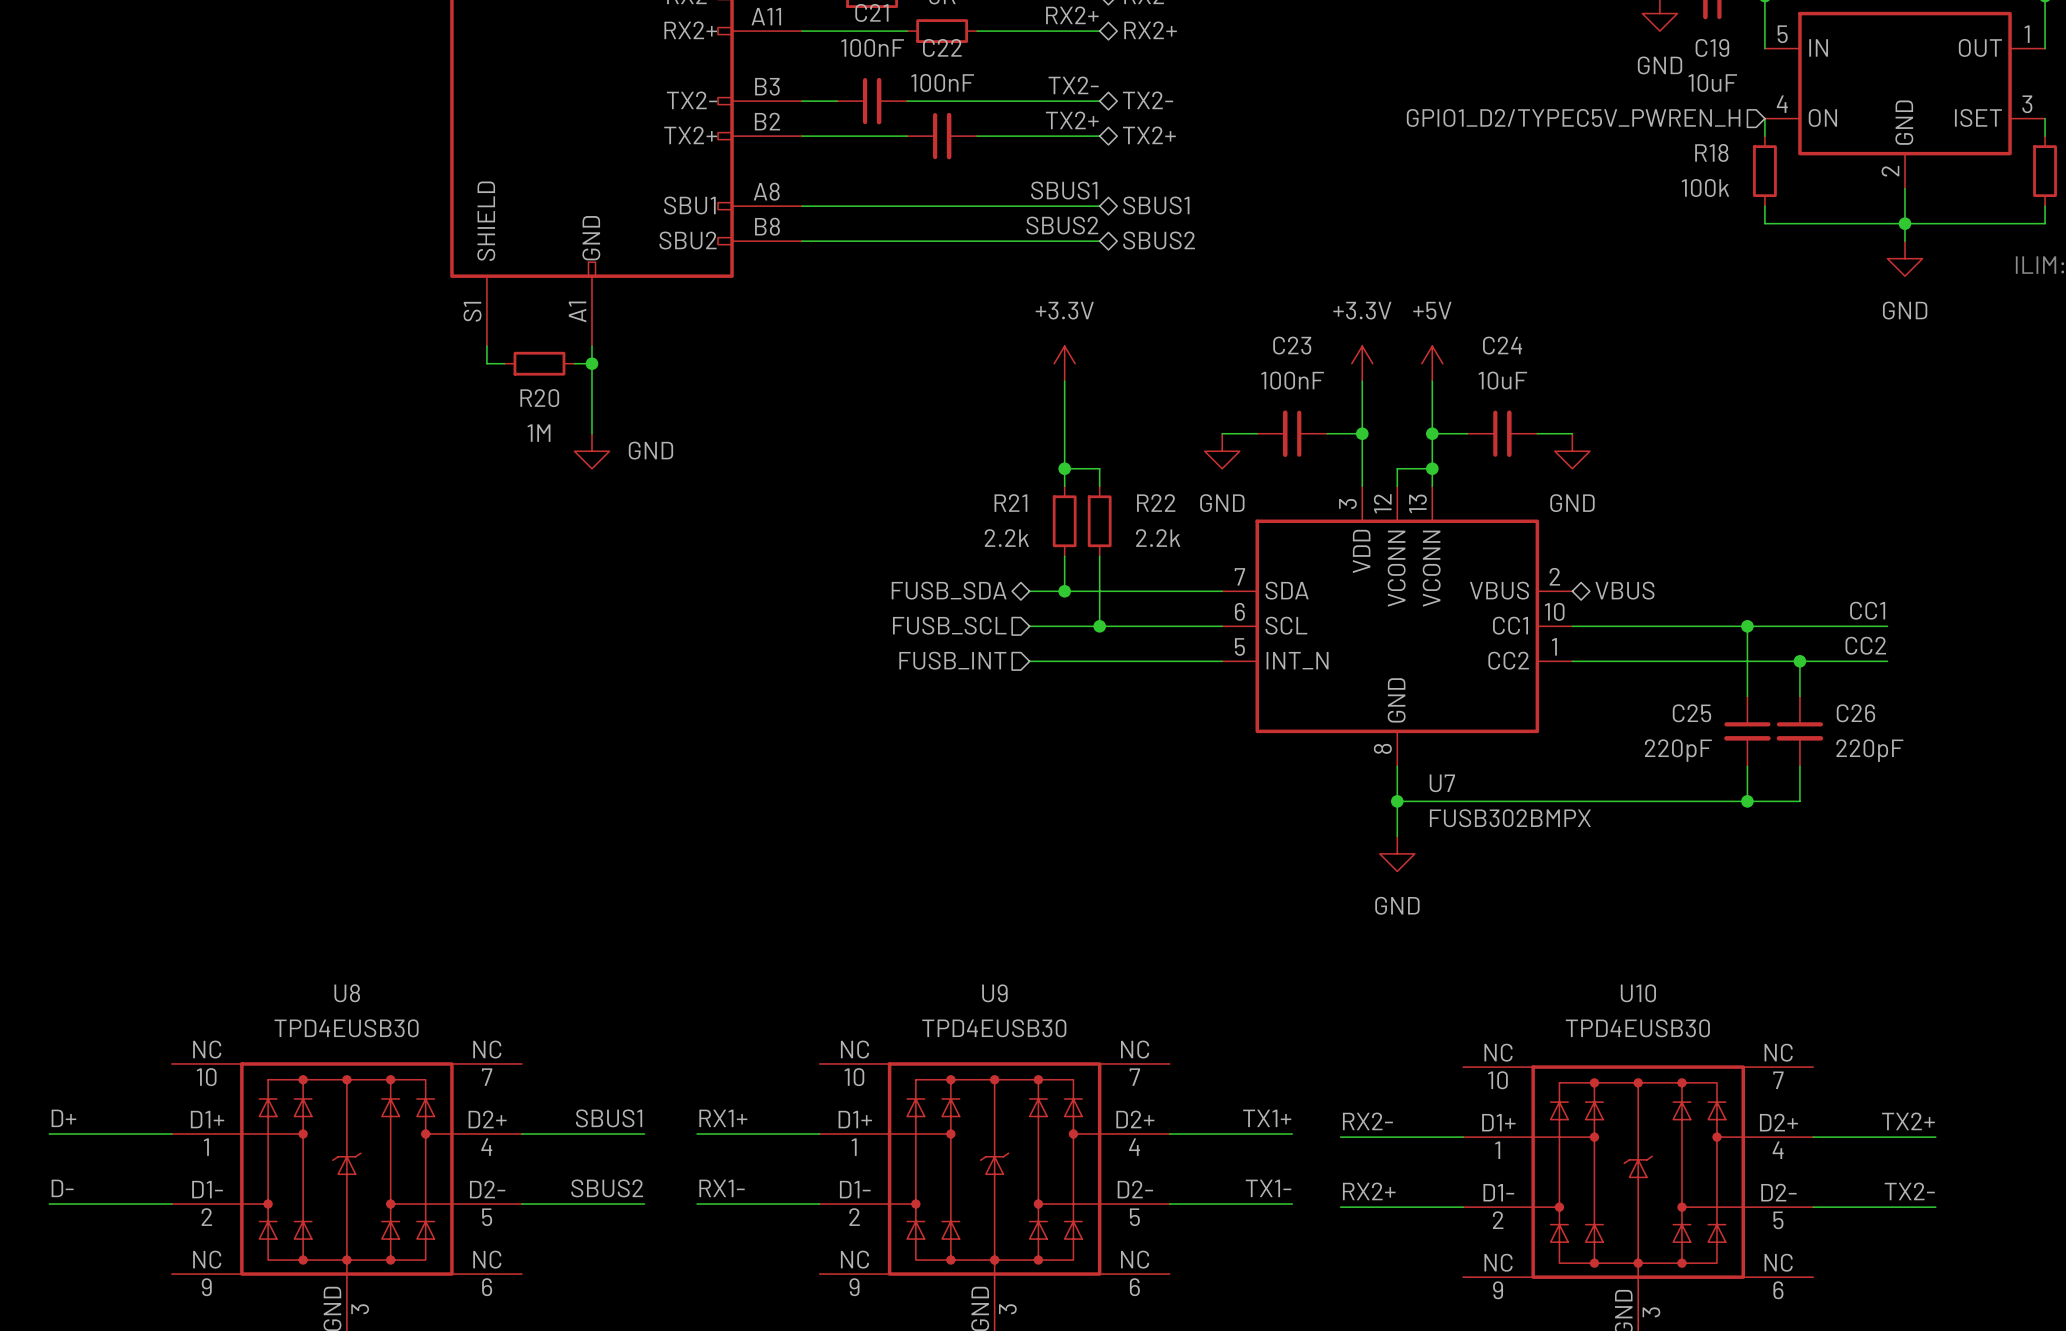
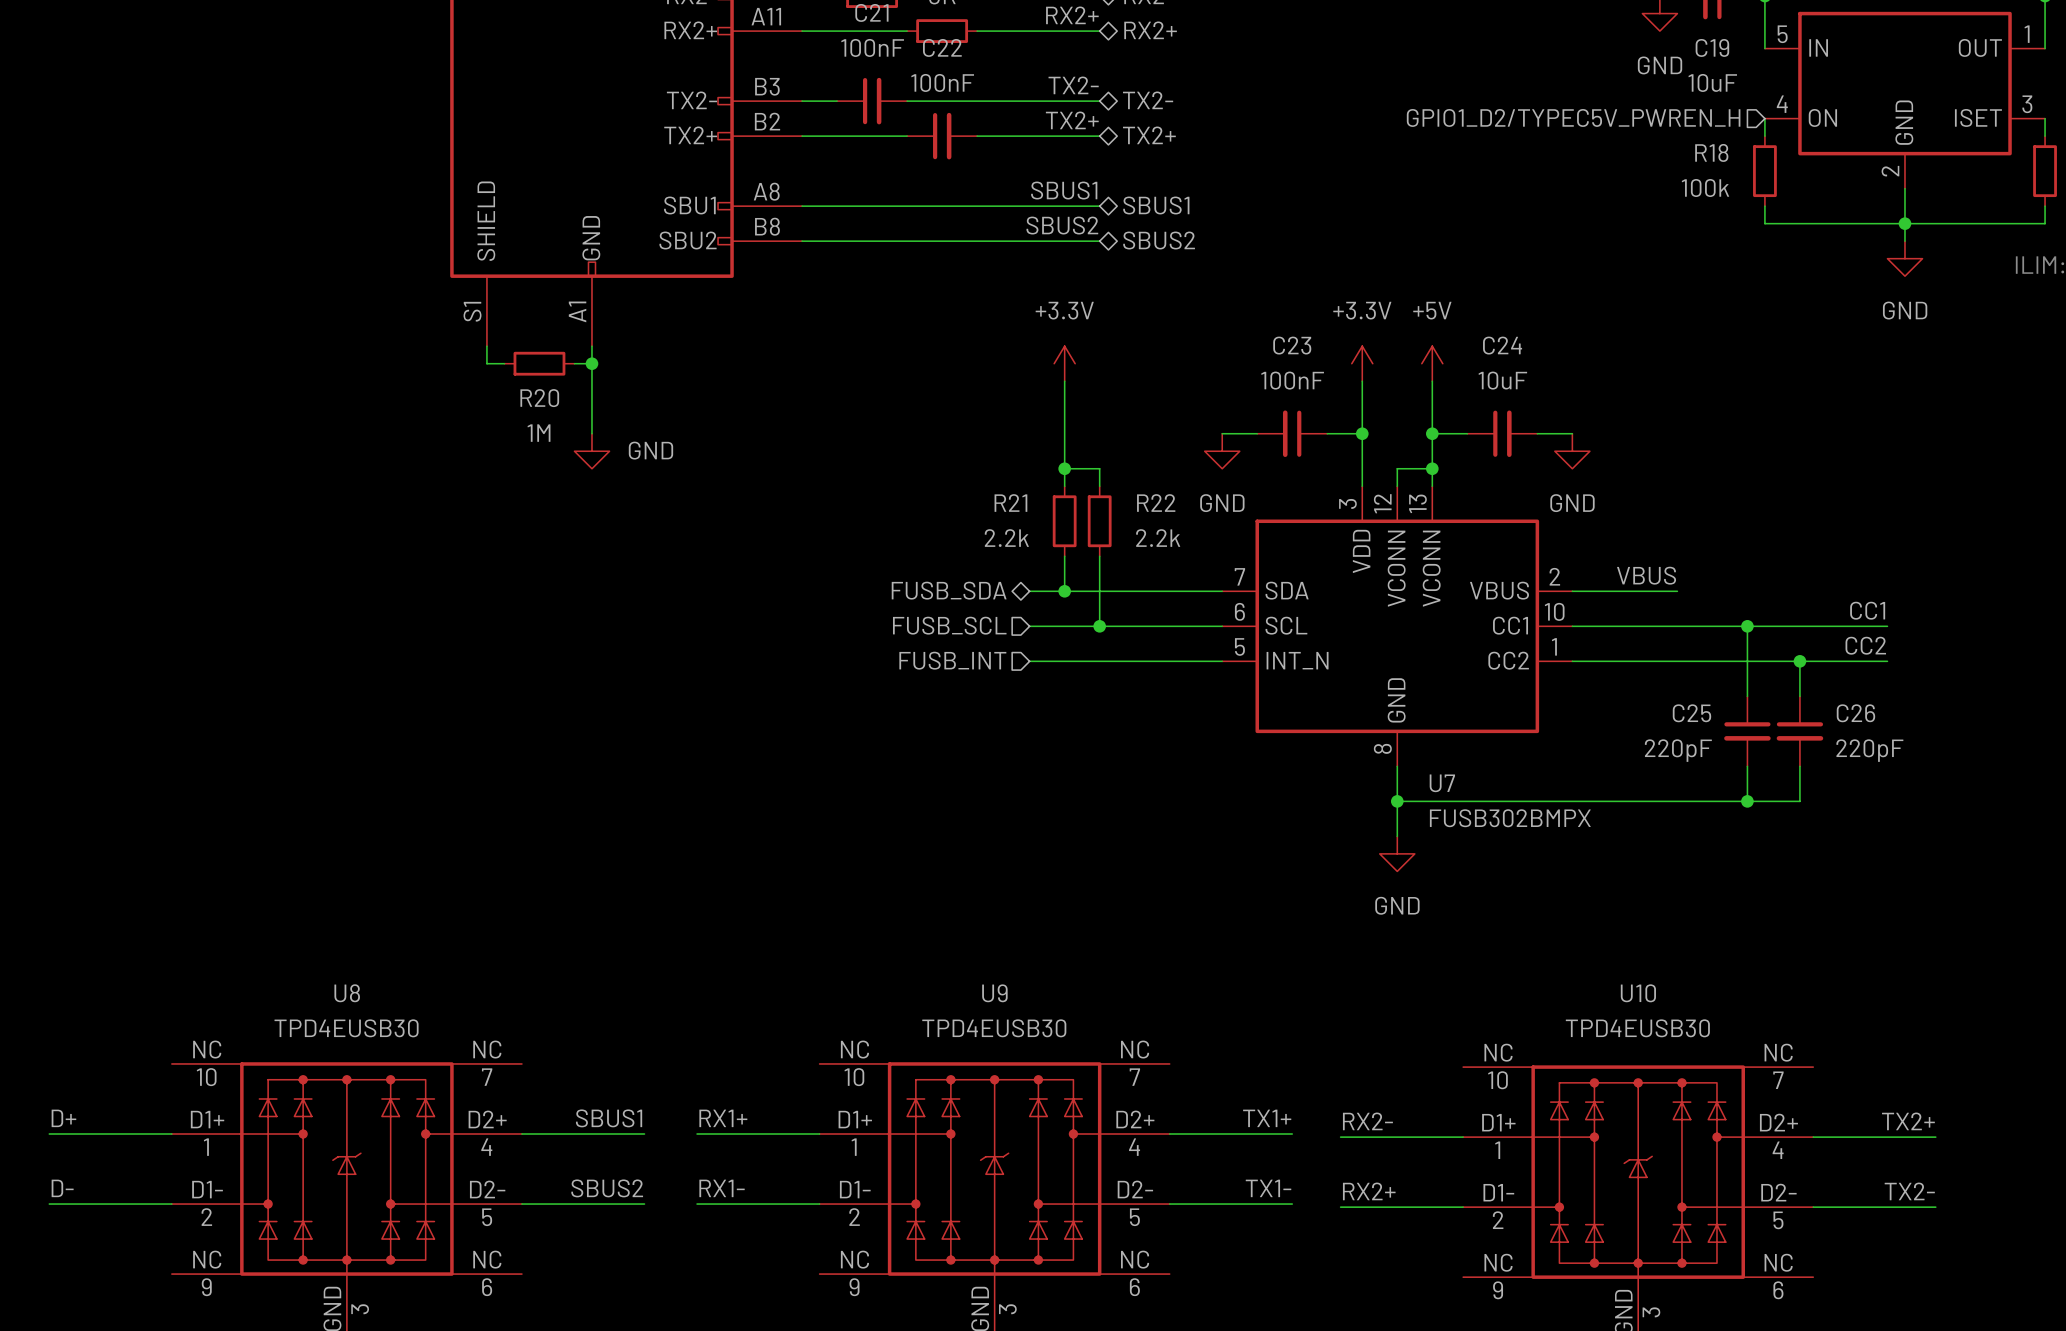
label: none -> VBUS (1646, 575)
hierarchical label: VBUS (1624, 590) -> none
wire: none -> (1572, 591) (1677, 591)

